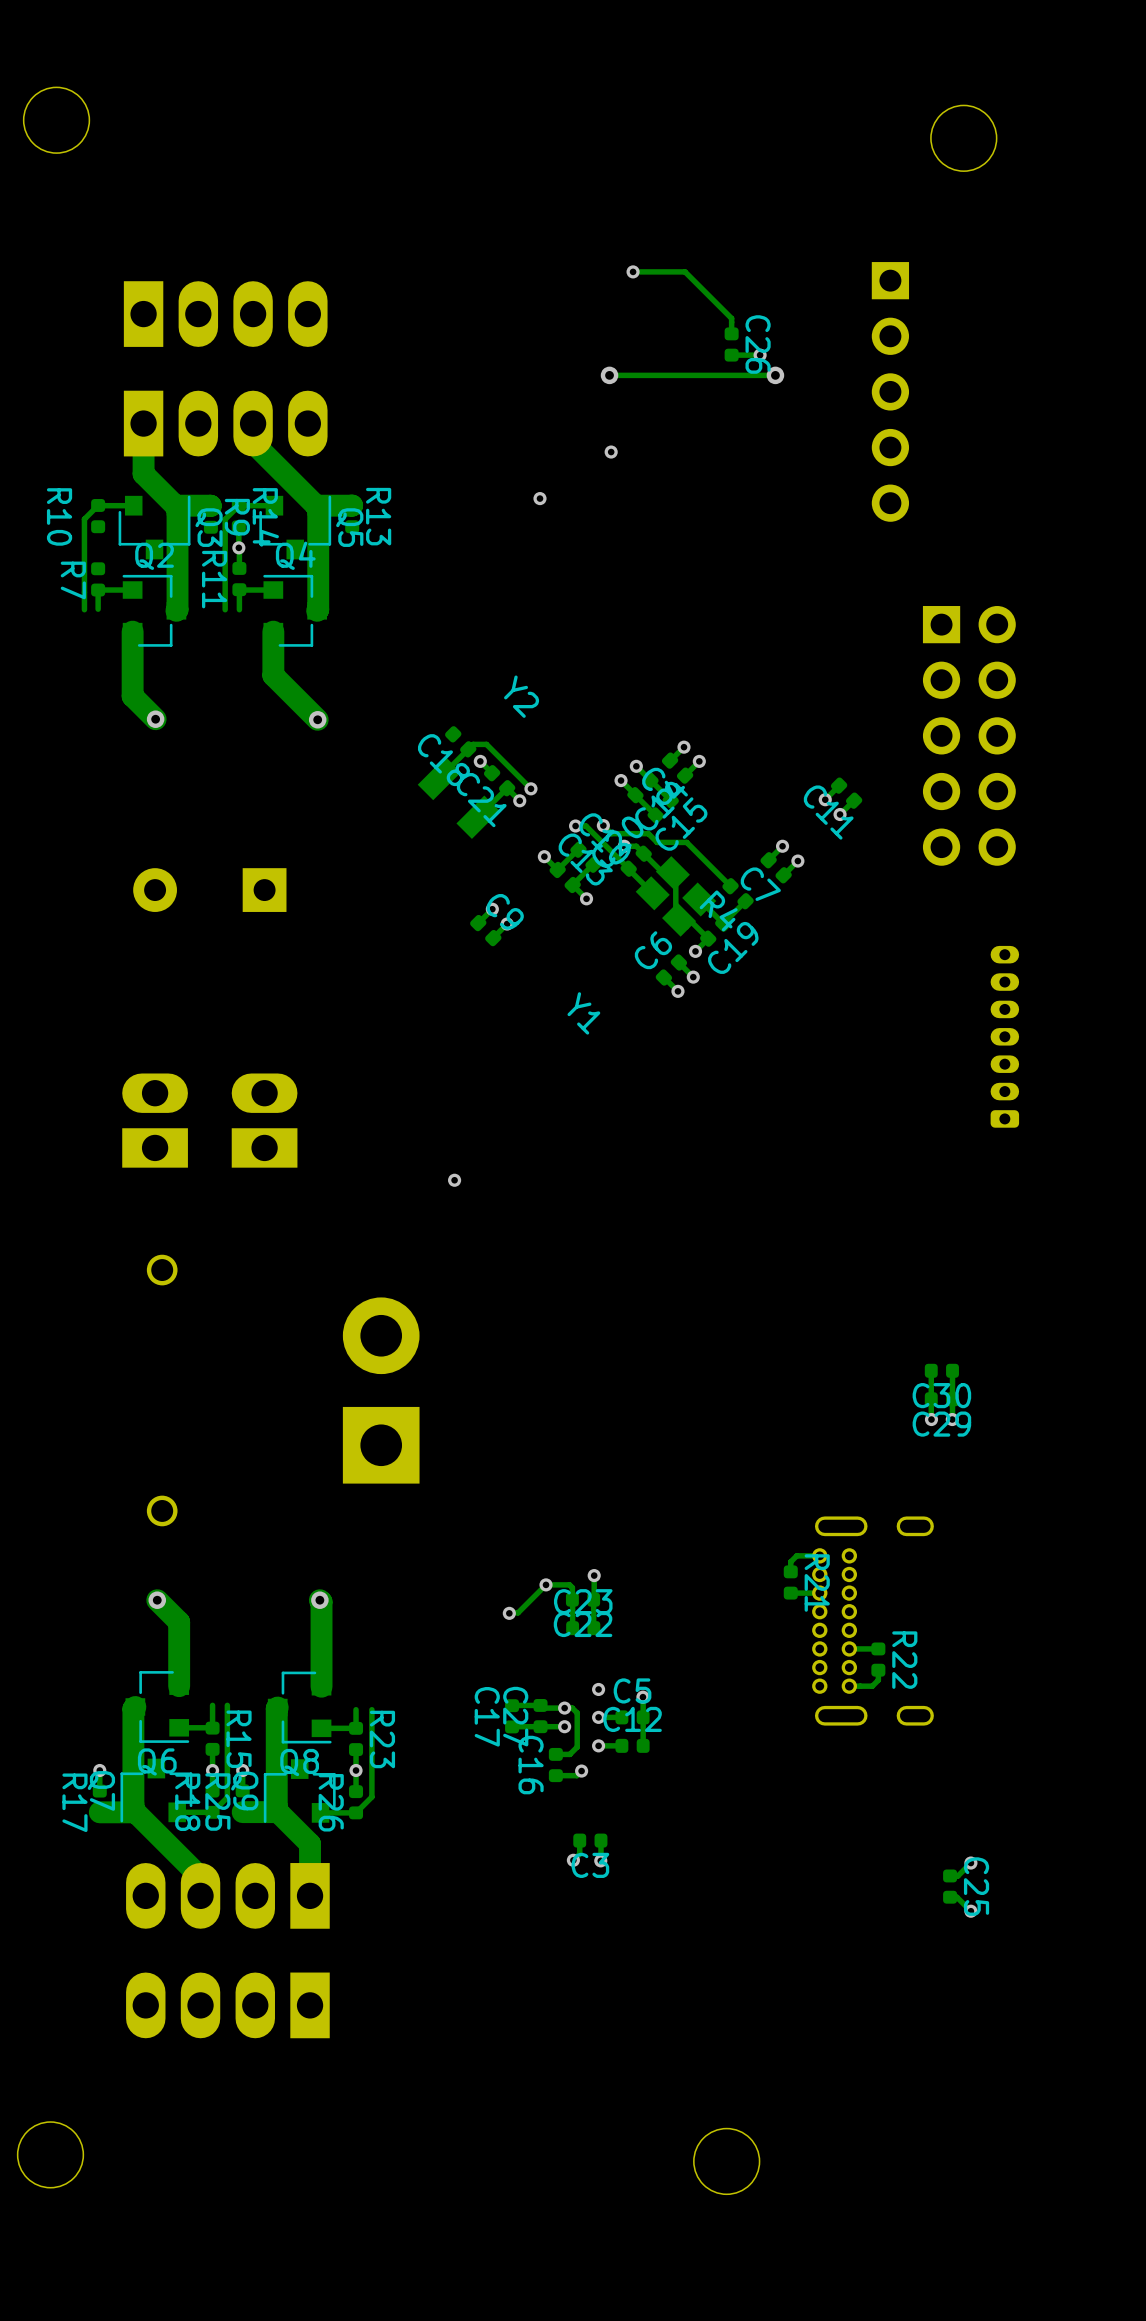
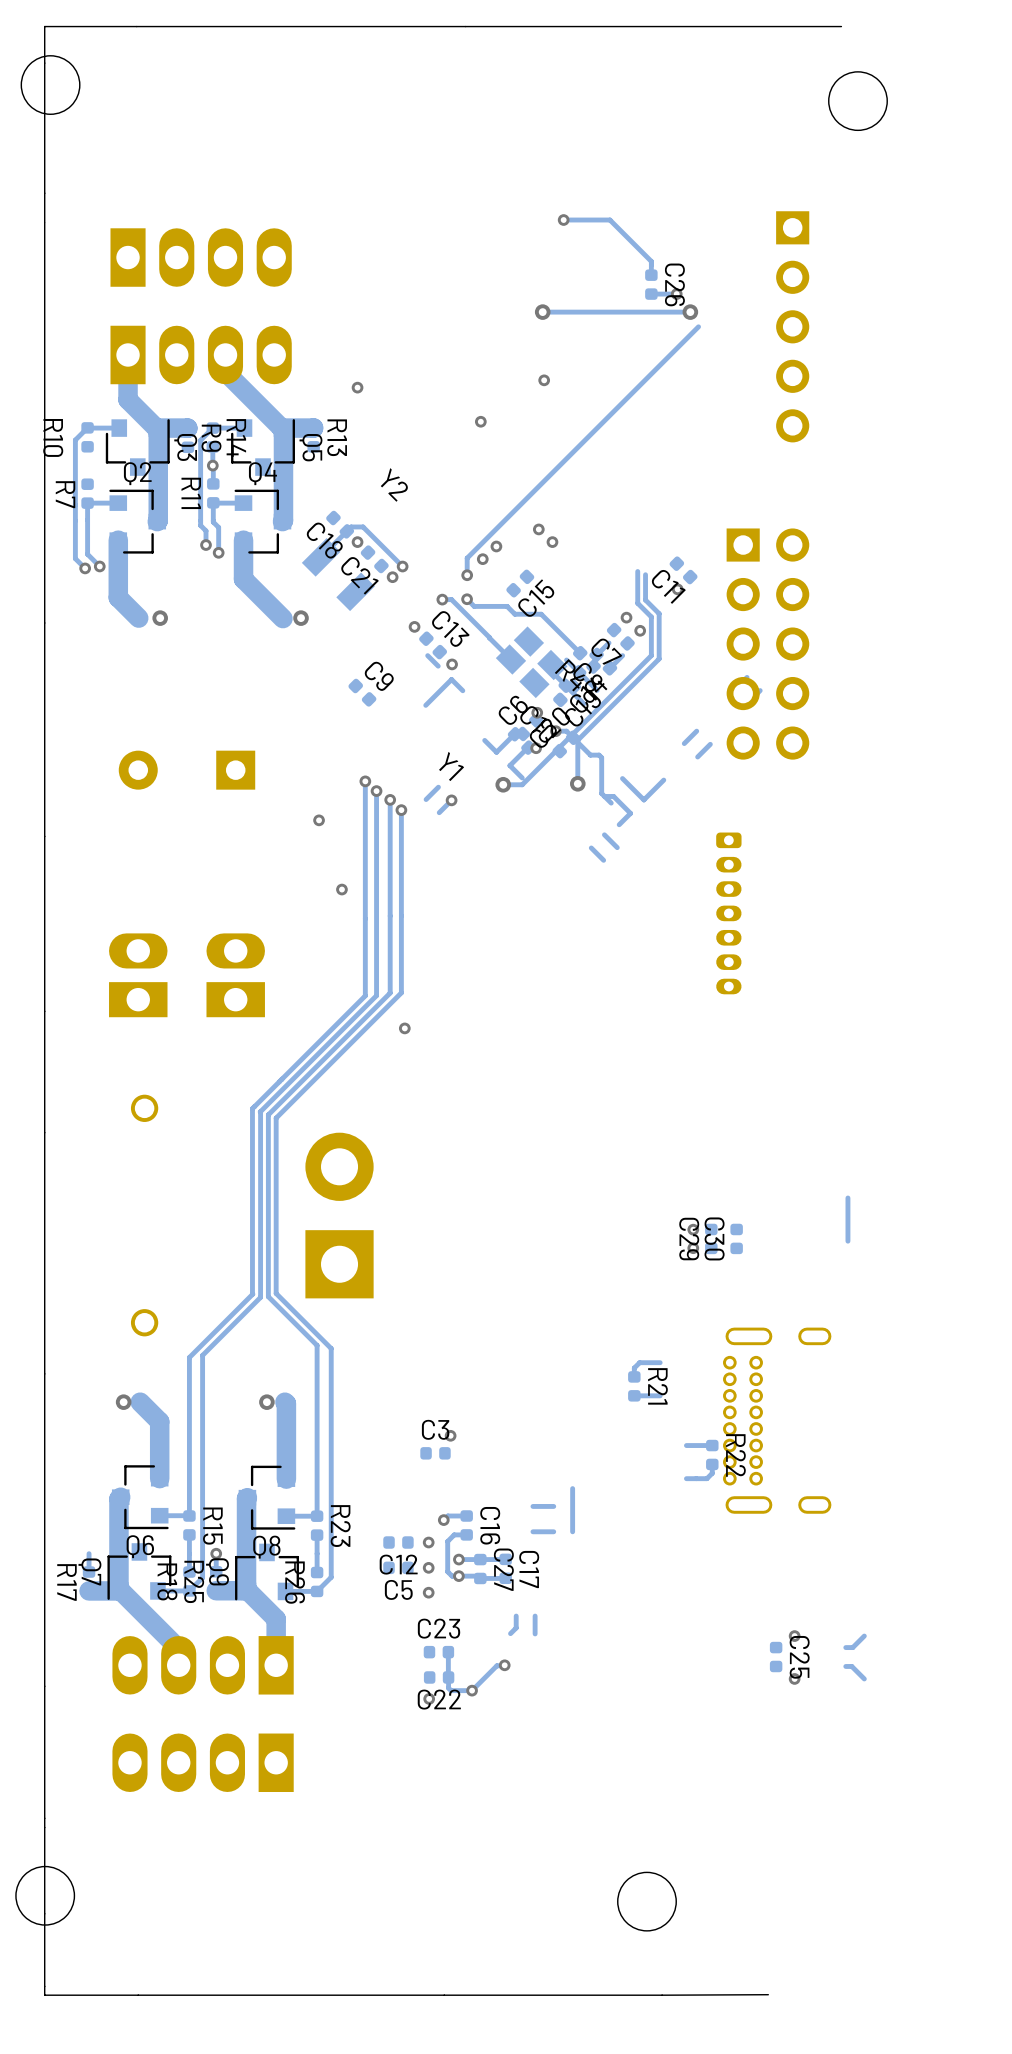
board edge: none -> (841, 26) (44, 26) (44, 222)
board edge: none -> (44, 222) (44, 1995) (768, 1994)
track: none -> (698, 326) (467, 558) (467, 575)
via: none -> (357, 387)
track: none -> (75, 520) (75, 558) (85, 568)
track: none -> (87, 520) (87, 554) (99, 566)
track: none -> (200, 520) (200, 525) (206, 530) (206, 545)
track: none -> (213, 520) (218, 527) (218, 552)
via: none -> (538, 529)
via: none -> (357, 542)
via: none -> (552, 542)
via: none -> (206, 545)
via: none -> (496, 546)
via: none -> (218, 552)
via: none -> (482, 559)
via: none -> (99, 566)
via: none -> (402, 566)
via: none -> (85, 568)
track: none -> (637, 571) (637, 603) (651, 616) (651, 655) (522, 784) (503, 784)
track: none -> (645, 574) (645, 600) (659, 613) (659, 658) (577, 740) (577, 783)
via: none -> (467, 575)
via: none -> (392, 577)
via: none -> (677, 589)
via: none -> (442, 599)
via: none -> (467, 599)
via: none -> (626, 617)
via position: (155, 719) -> (160, 618)
via position: (317, 719) -> (301, 618)
via: none -> (414, 626)
via: none -> (640, 630)
part position: (969, 735) -> (767, 644)
C18 position: (460, 741) -> (340, 524)
via: (683, 747) -> none
via: (480, 761) -> none
via: (699, 761) -> none
via: (636, 766) -> none
via: none -> (452, 664)
track: (439, 778) (473, 744) (486, 744) (530, 788) -> (321, 557) (351, 526) (363, 526) (402, 566)
C21 position: (499, 780) -> (374, 559)
via: (621, 780) -> none
via: (530, 788) -> none
C11 position: (846, 793) -> (683, 570)
Y2 position: (458, 797) -> (338, 574)
via: (825, 799) -> none
via: (519, 800) -> none
C15 position: (663, 807) -> (520, 583)
via: (840, 814) -> none
track: (603, 825) (611, 833) (648, 833) (657, 842) (686, 842) (730, 886) -> (467, 599) (474, 606) (507, 606) (514, 614) (541, 614) (580, 653)
track: (575, 826) (585, 826) (652, 893) -> (442, 599) (451, 599) (511, 659)
via: (575, 826) -> none
via: (782, 846) -> none
via: (544, 856) -> none
via: (797, 861) -> none
via: none -> (536, 748)
C7 position: (776, 867) -> (620, 636)
C13 position: (565, 877) -> (433, 645)
R4 position: (738, 893) -> (586, 659)
Y1 position: (675, 896) -> (531, 662)
via: (586, 898) -> none
track: none -> (365, 781) (365, 995) (252, 1108) (252, 1294) (189, 1357) (189, 1495)
via: none -> (365, 781)
via: none -> (577, 783)
via: none -> (503, 784)
via: (492, 909) -> none
track: none -> (376, 791) (376, 995) (260, 1111) (260, 1297) (202, 1355) (202, 1495)
via: none -> (376, 791)
track: none -> (390, 799) (390, 993) (268, 1114) (268, 1296) (317, 1345) (317, 1499)
via: none -> (390, 799)
C9 position: (485, 930) -> (362, 692)
C19 position: (715, 931) -> (567, 693)
track: none -> (401, 810) (401, 992) (276, 1118) (276, 1293) (331, 1348) (331, 1499)
via: none -> (401, 810)
via: none -> (319, 820)
via: (695, 951) -> none
C6 position: (671, 970) -> (529, 727)
via: (693, 977) -> none
via: (677, 991) -> none
via: none -> (341, 889)
part rotation: 0° (1004, 1036) -> 180° (728, 913)
part position: (1004, 1036) -> (728, 913)
track: (931, 1370) (931, 1419) -> none
C30 rotation: 0° (941, 1370) -> 90° clockwise (736, 1238)
C30 position: (941, 1370) -> (736, 1238)
C29 rotation: 0° (941, 1399) -> 90° clockwise (711, 1238)
C29 position: (941, 1399) -> (711, 1238)
via: none -> (693, 1229)
via: (931, 1419) -> none
via: (952, 1419) -> none
via: none -> (693, 1248)
track: (819, 1555) (796, 1555) (790, 1561) (790, 1571) -> (660, 1362) (639, 1362) (634, 1368) (634, 1376)
track: (594, 1575) (593, 1627) -> none
via: (594, 1575) -> none
R21 position: (790, 1582) -> (634, 1386)
via: (546, 1584) -> none
track: (819, 1593) (790, 1593) -> (660, 1395) (634, 1395)
C22 position: (583, 1599) -> (439, 1677)
via position: (157, 1600) -> (123, 1402)
via position: (319, 1600) -> (266, 1402)
track: (509, 1613) (518, 1612) (546, 1584) (569, 1584) (572, 1587) (572, 1628) -> none
via position: (509, 1613) -> (450, 1435)
C23 position: (583, 1628) -> (438, 1652)
track: (878, 1648) (849, 1648) -> (712, 1445) (686, 1445)
R22 position: (878, 1659) -> (712, 1454)
track: (878, 1670) (878, 1680) (872, 1686) (849, 1686) -> (712, 1464) (712, 1473) (706, 1478) (686, 1478)
via: (598, 1689) -> none
C5 name position: C5 (632, 1690) -> C5 (398, 1589)
via: (642, 1697) -> none
track: (512, 1705) (572, 1708) (577, 1713) (577, 1747) (569, 1754) (555, 1754) -> none
via: (564, 1708) -> none
C17 name position: C17 (487, 1716) -> C17 (529, 1569)
C17 position: (512, 1716) -> (505, 1568)
C27 name position: C27 (515, 1716) -> C27 (503, 1569)
C27 position: (540, 1716) -> (480, 1569)
via: (598, 1717) -> none
C5 position: (632, 1717) -> (398, 1567)
C12 name position: C12 (632, 1719) -> C12 (398, 1564)
track: (564, 1726) (512, 1726) -> (505, 1559) (458, 1559)
via: (564, 1726) -> none
track: none -> (466, 1516) (447, 1516) (443, 1520)
via: none -> (443, 1520)
via: (598, 1745) -> none
C12 position: (632, 1745) -> (398, 1542)
track: none -> (466, 1534) (454, 1534) (447, 1541) (447, 1571) (452, 1576) (505, 1578)
via: none -> (428, 1542)
C16 name position: C16 (531, 1765) -> C16 (490, 1525)
C16 position: (555, 1765) -> (466, 1525)
via: (99, 1770) -> none
via: (212, 1770) -> none
via: (356, 1770) -> none
track: (581, 1771) (577, 1775) (555, 1775) -> none
via: (581, 1771) -> none
via: none -> (458, 1559)
via: none -> (428, 1567)
via: none -> (458, 1576)
via: none -> (428, 1592)
C3 position: (590, 1840) -> (435, 1453)
via: (573, 1860) -> none
via: (600, 1860) -> none
via: none -> (794, 1636)
via: (970, 1863) -> none
C3 name position: C3 (590, 1865) -> C3 (435, 1429)
track: none -> (448, 1652) (448, 1677)
C25 position: (950, 1886) -> (776, 1657)
track: none -> (504, 1665) (496, 1665) (472, 1690) (451, 1690) (448, 1688) (448, 1677)
via: none -> (504, 1665)
via: none -> (794, 1678)
via: (970, 1911) -> none
via: none -> (472, 1690)
via: none -> (429, 1698)

